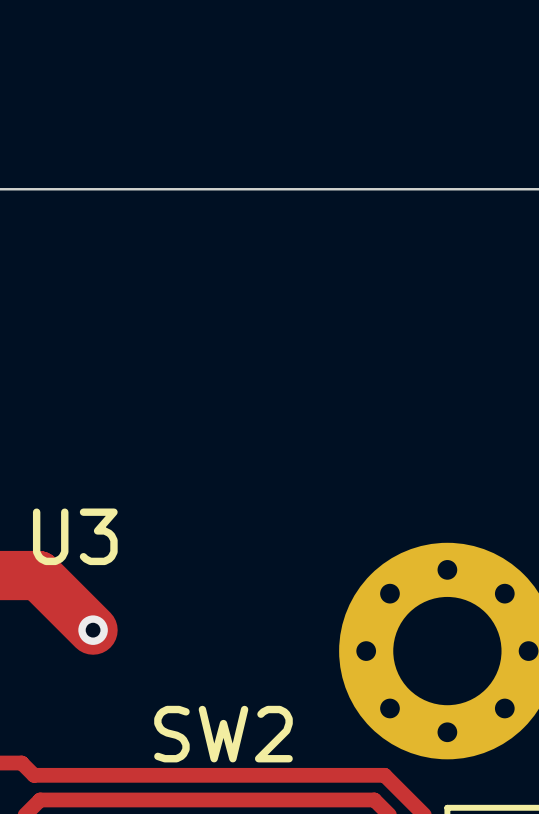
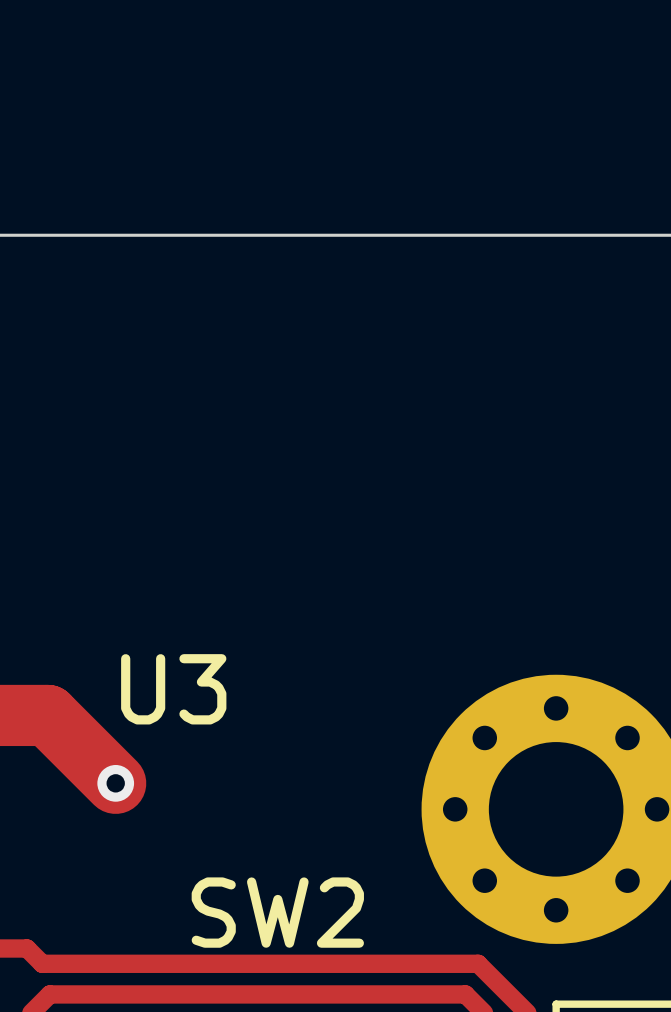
U3 name position: U3 (75, 536) -> U3 (173, 689)

